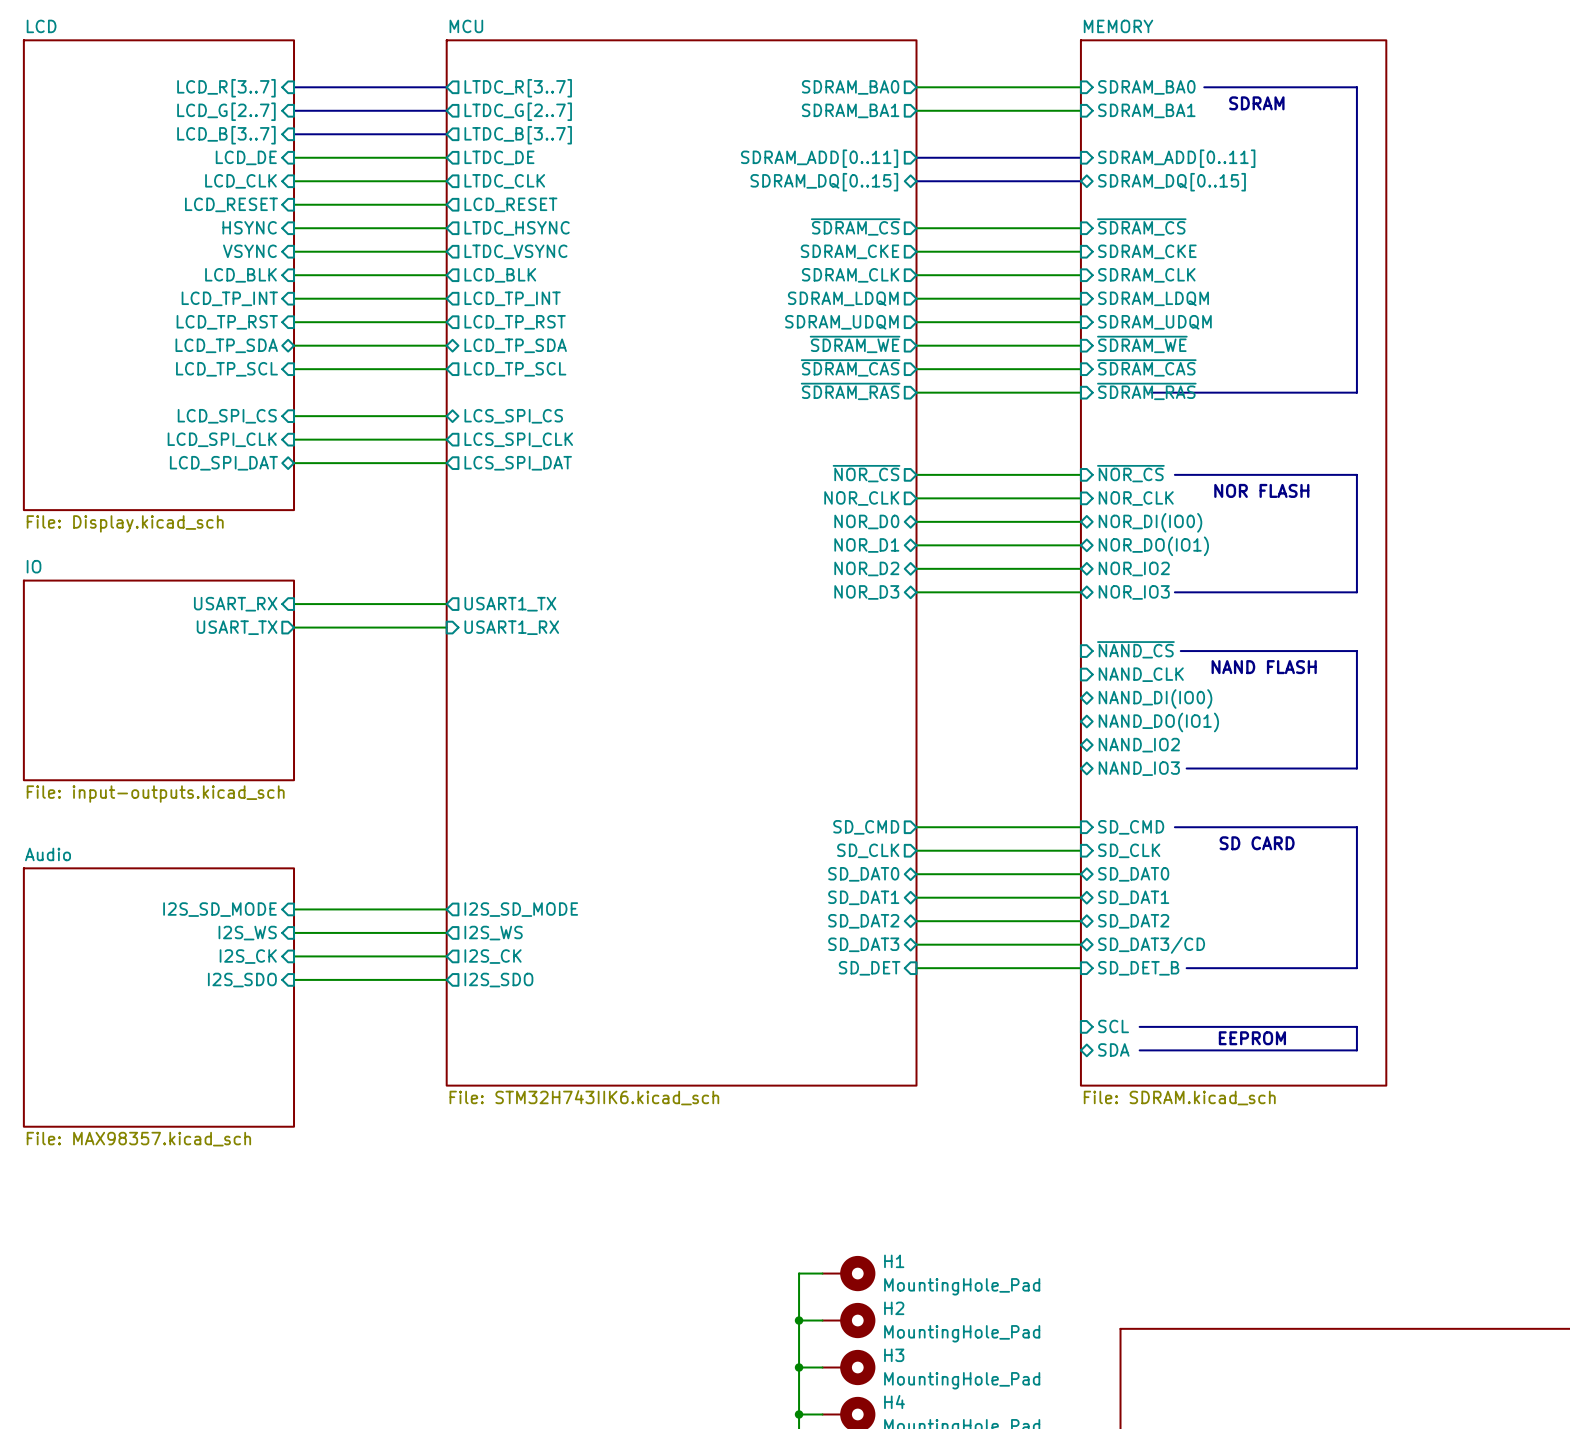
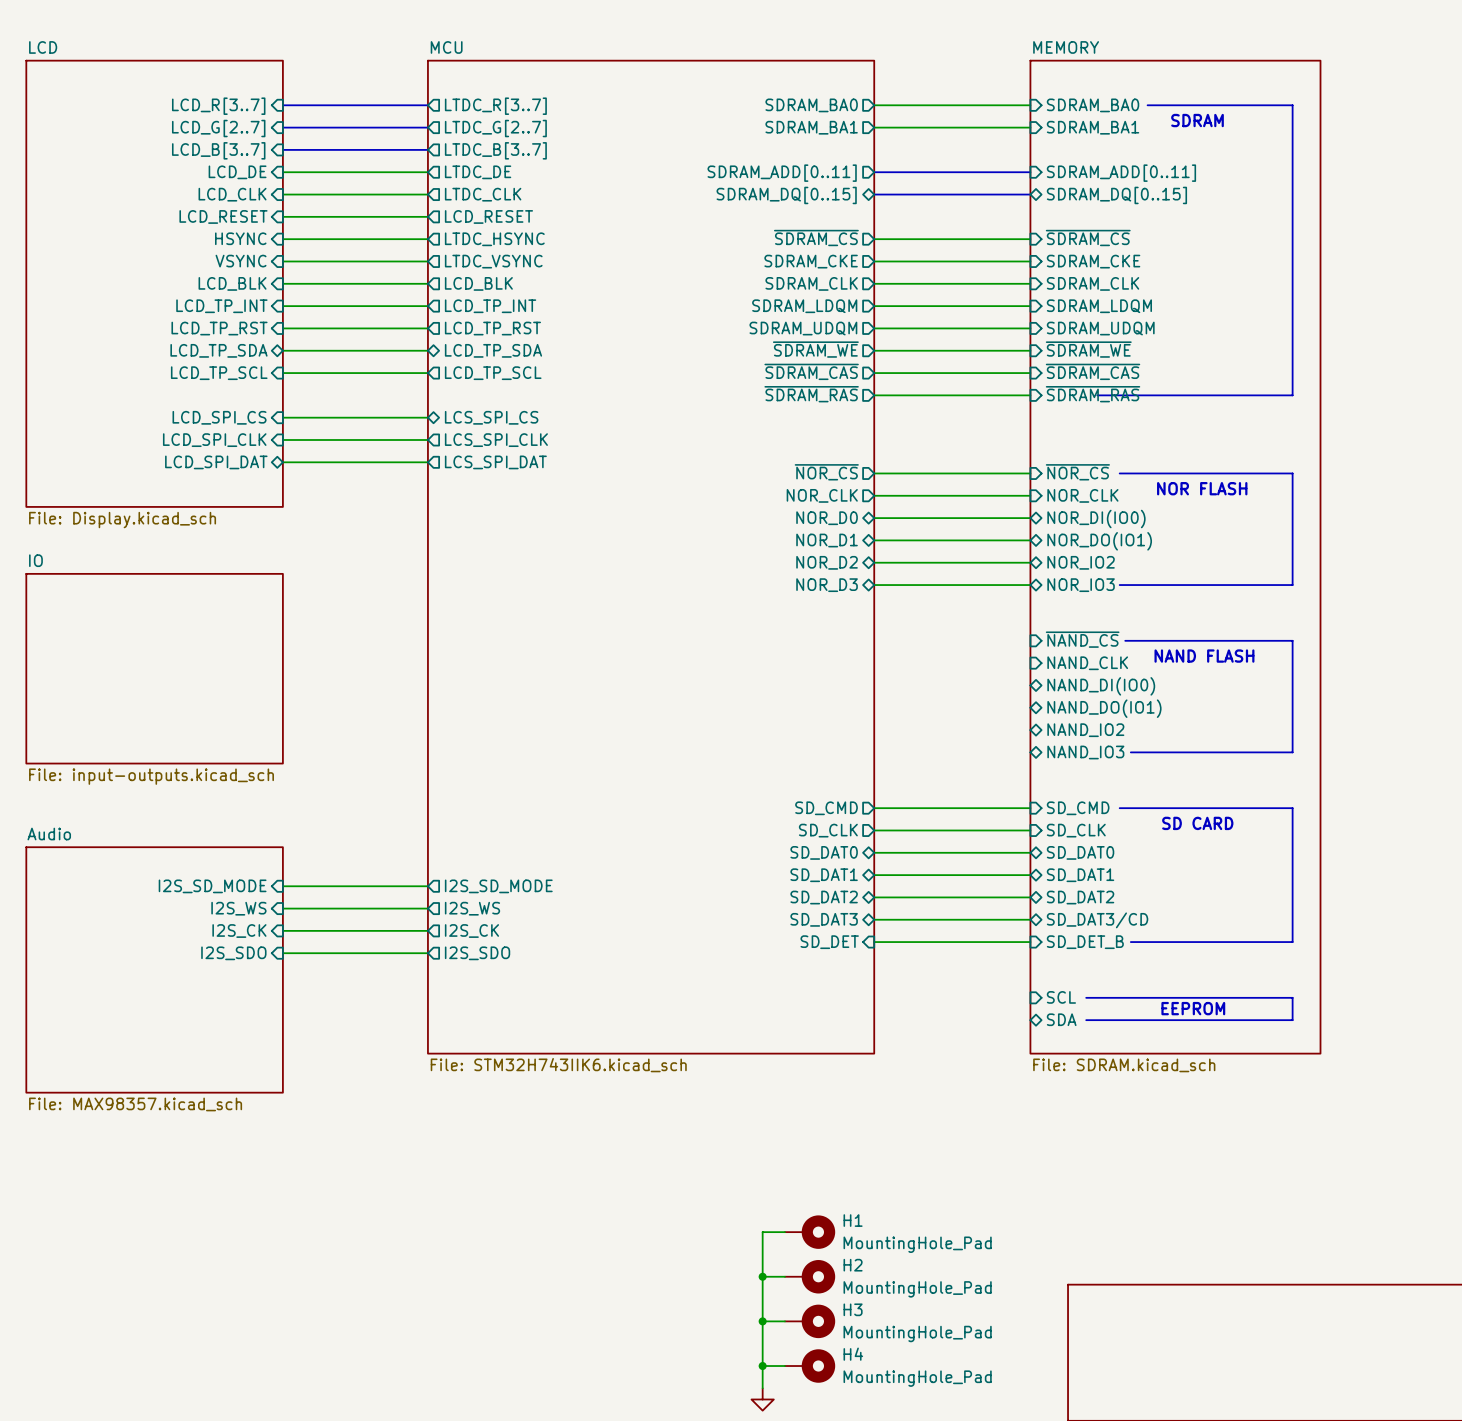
sheet pin: USART_RX (235, 604) -> none
wire: (294, 604) (446, 604) -> none
sheet pin: USART1_TX (510, 604) -> none
sheet pin: USART_TX (237, 627) -> none
wire: (294, 627) (446, 627) -> none
sheet pin: USART1_RX (511, 627) -> none

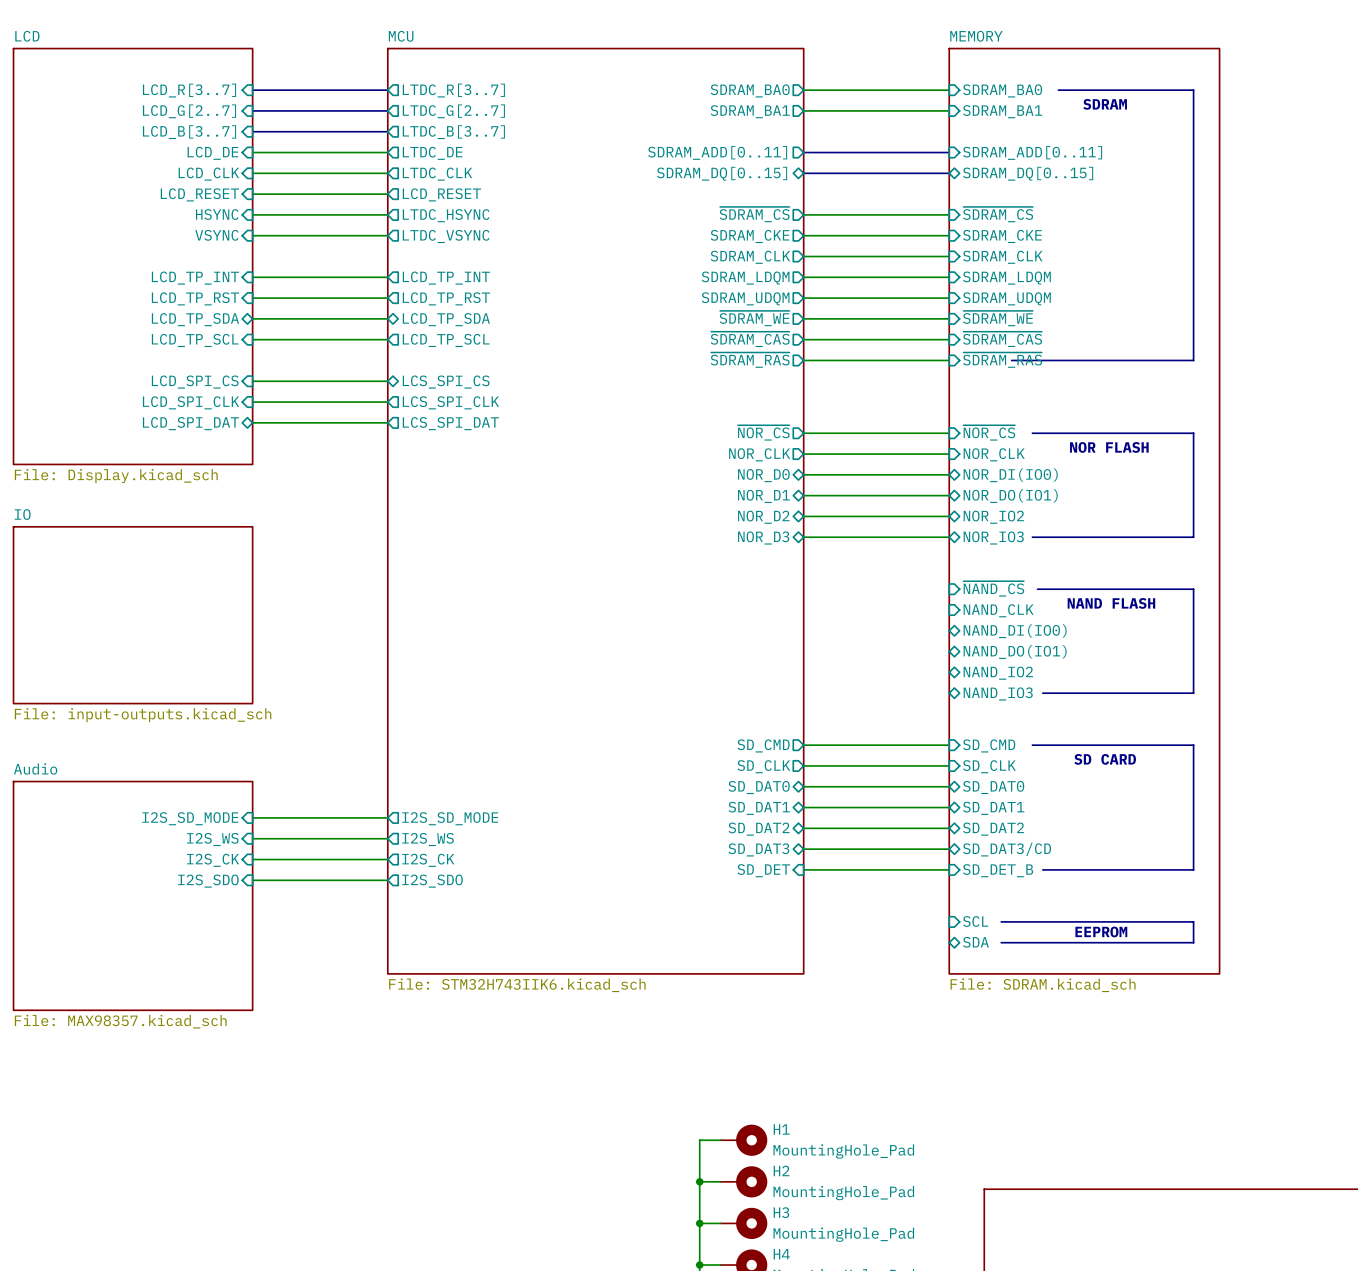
sheet pin: LCD_BLK (232, 283) -> none
wire: (282, 283) (427, 283) -> none
sheet pin: LCD_BLK (478, 283) -> none

